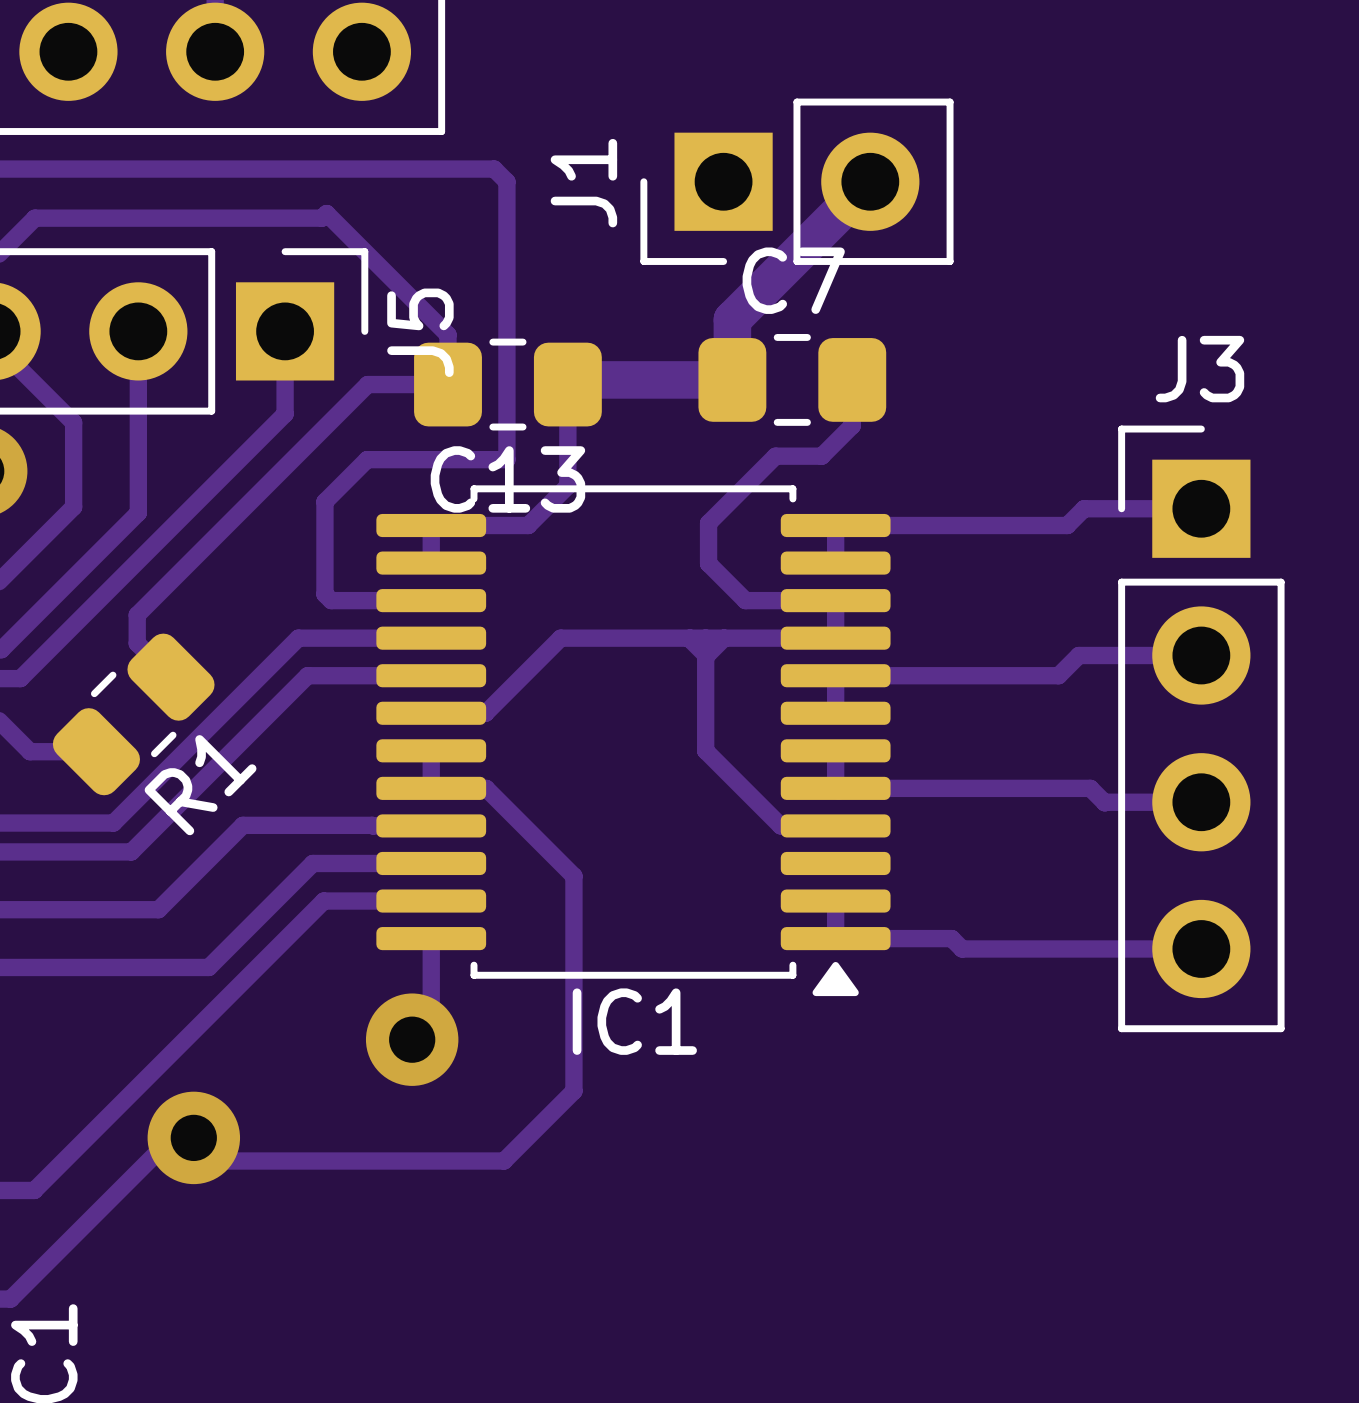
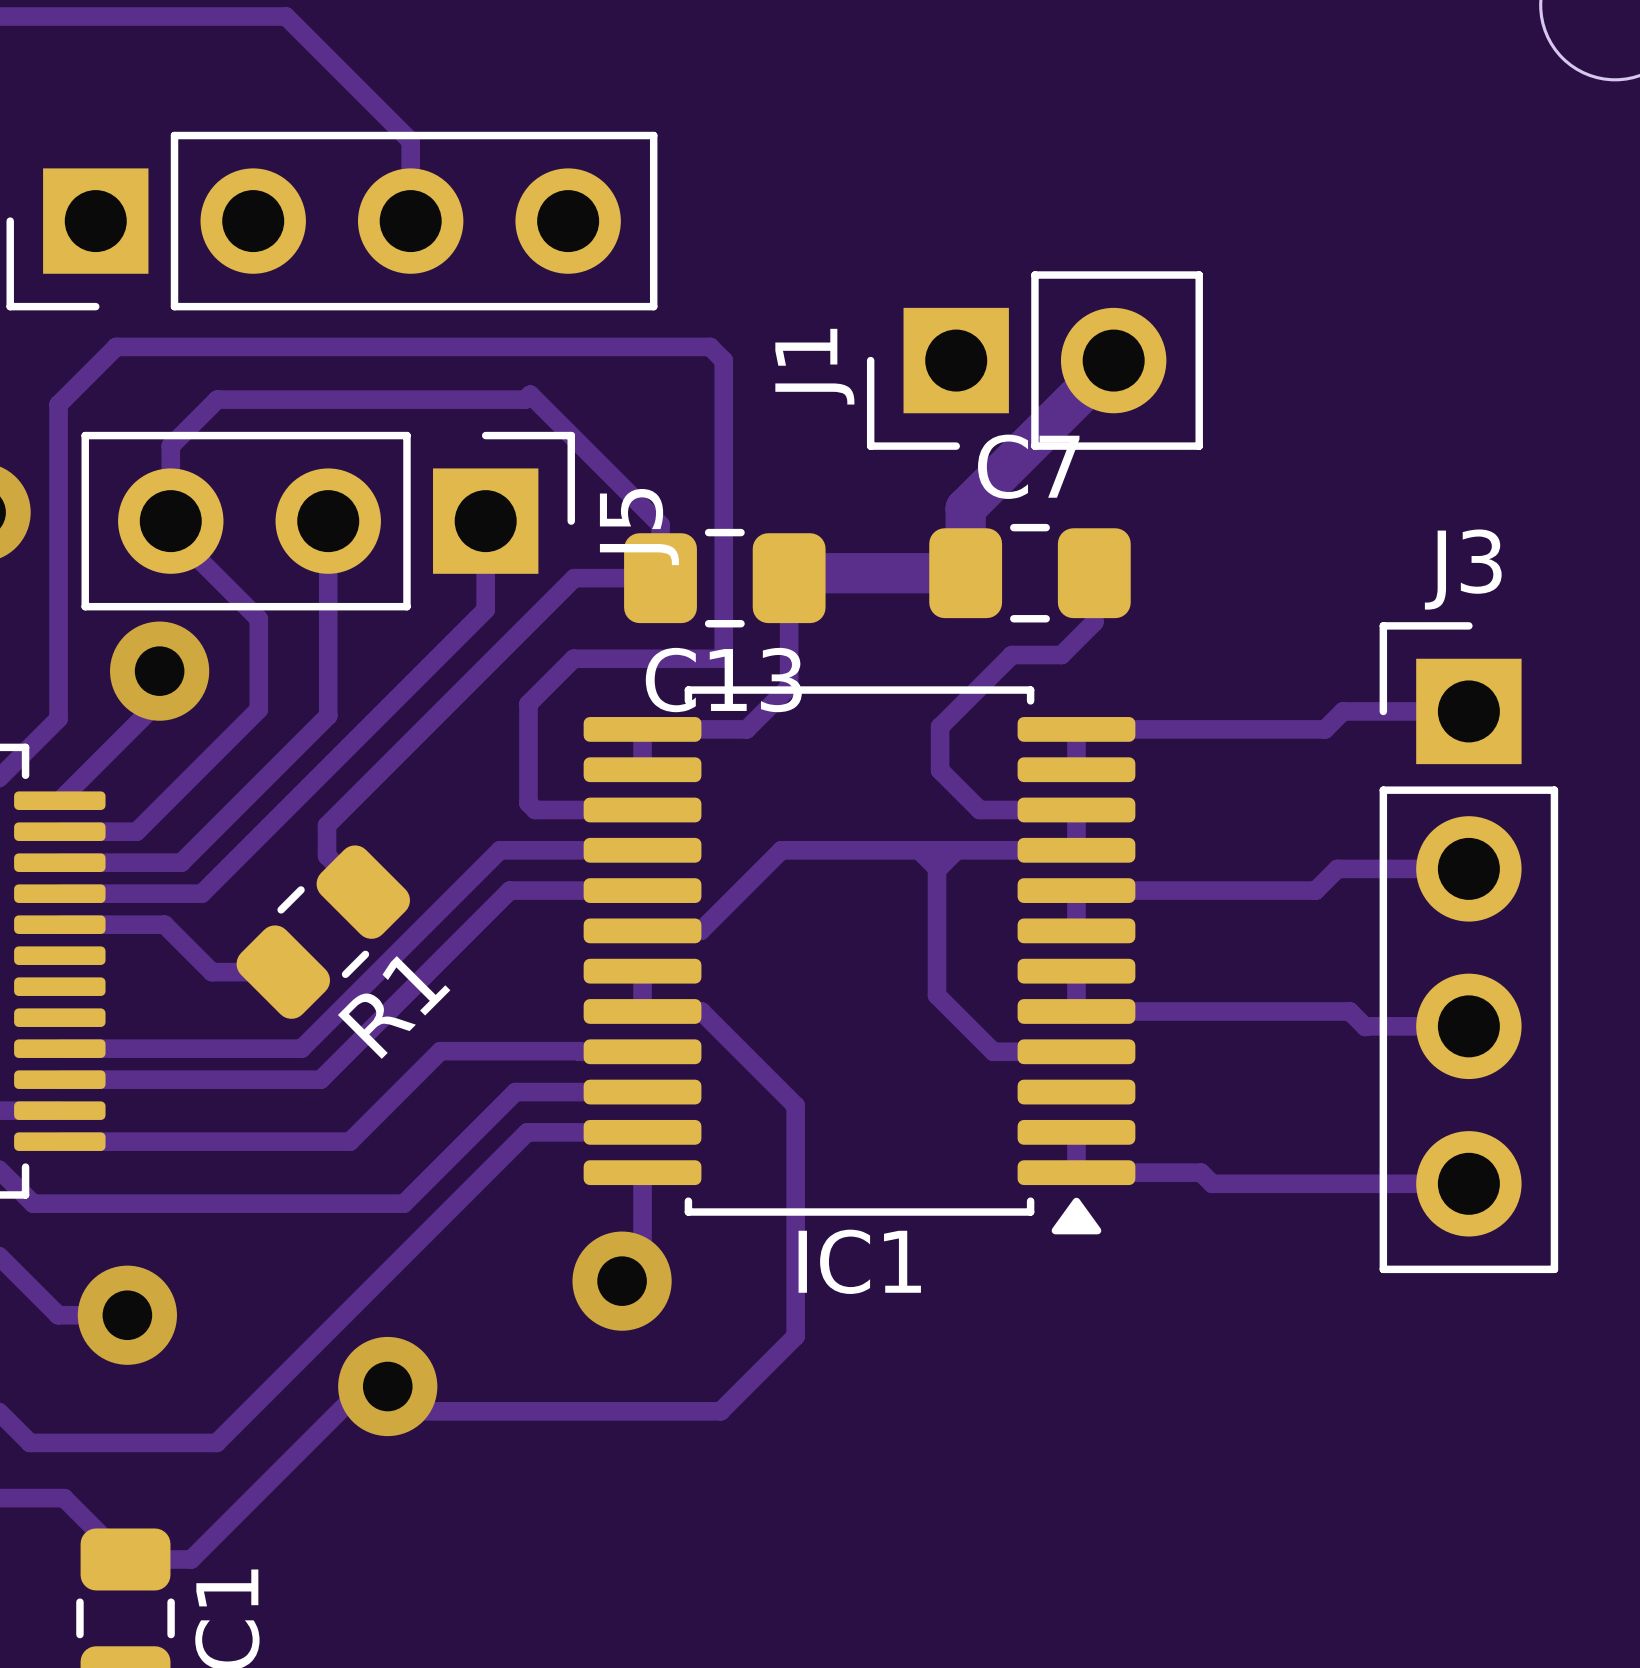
track: (705, 750) (780, 825) -> (936, 971) (936, 995) (993, 1051) (1017, 1051)

